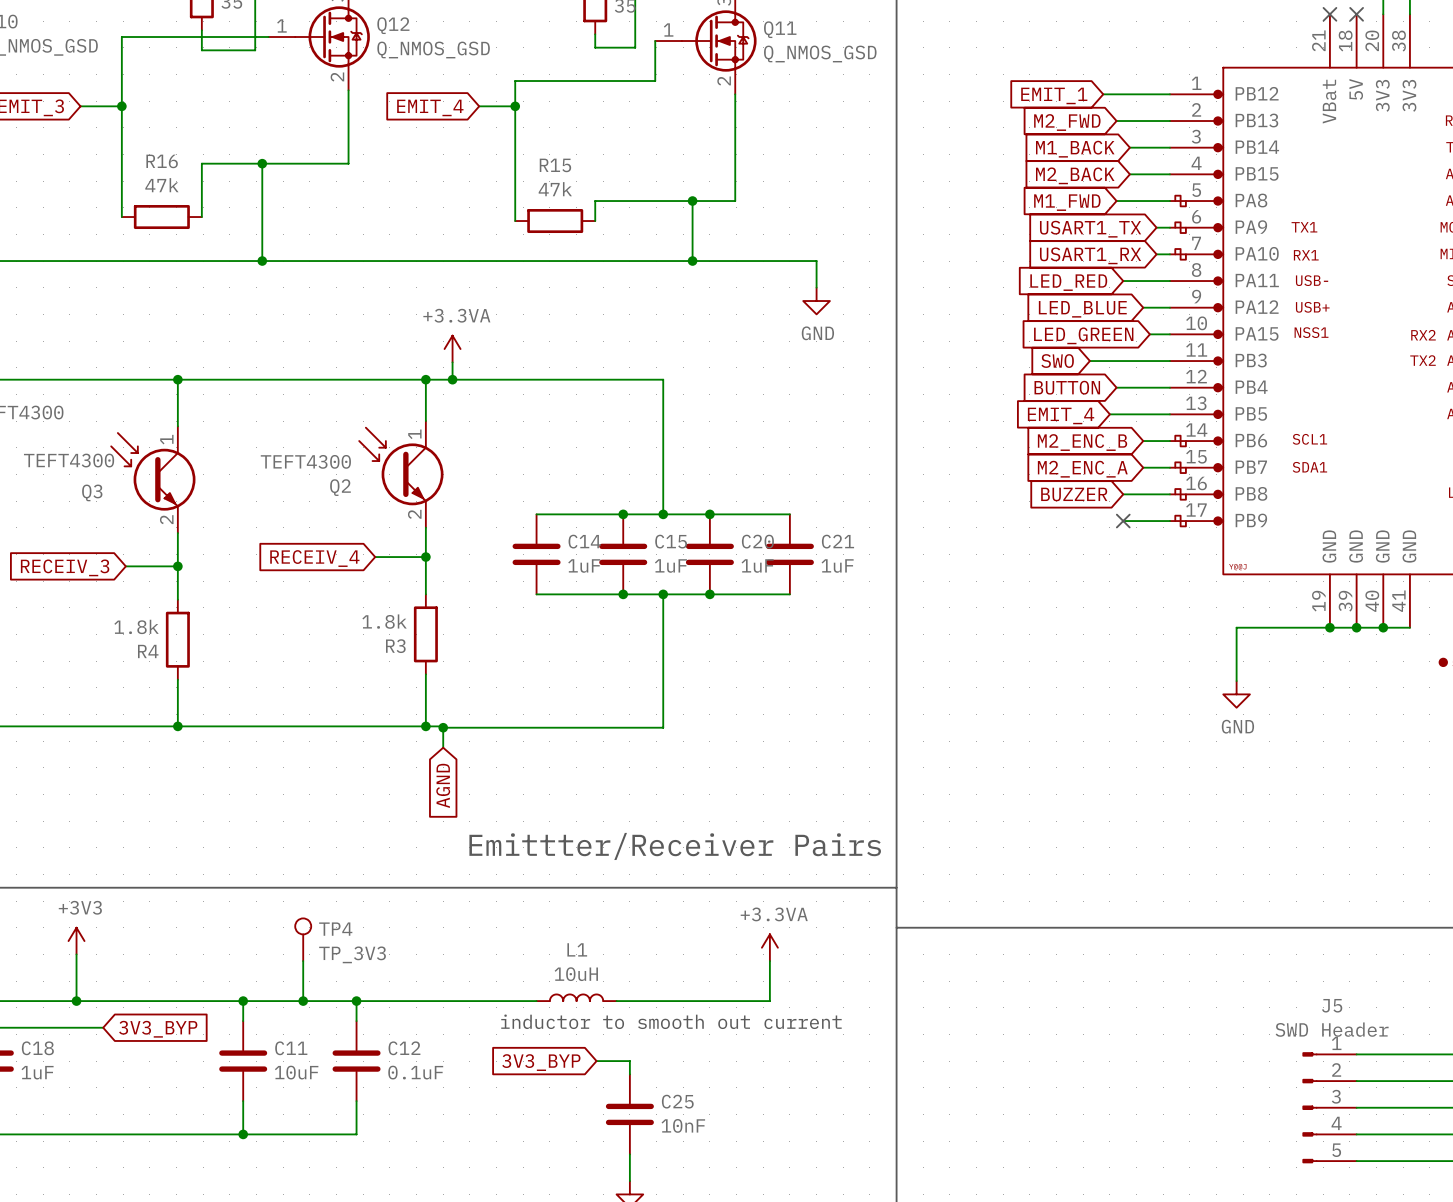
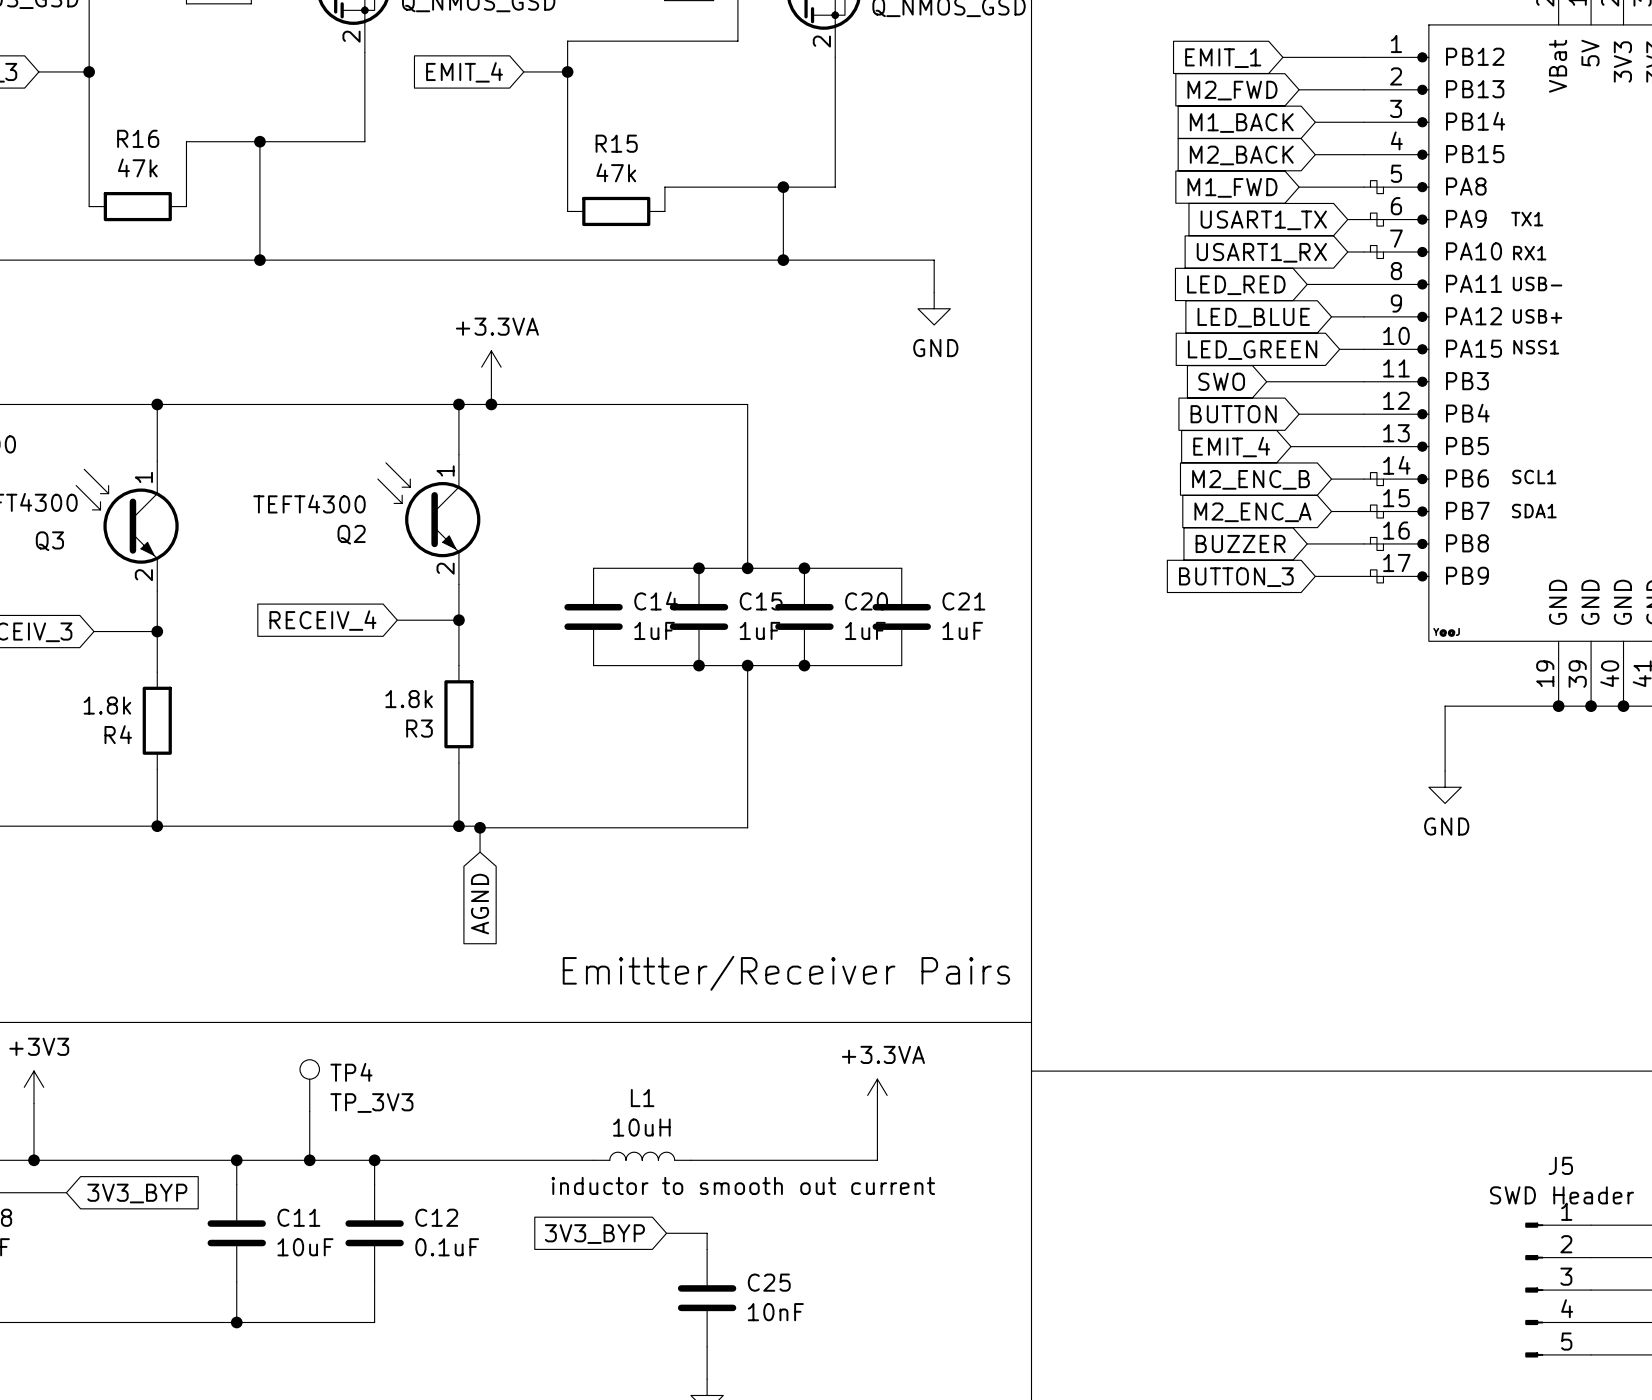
wire: (1123, 521) (1129, 521) -> none
no-connect mark: (1123, 521) -> none
global label: none -> BUTTON_3 (1236, 577)

